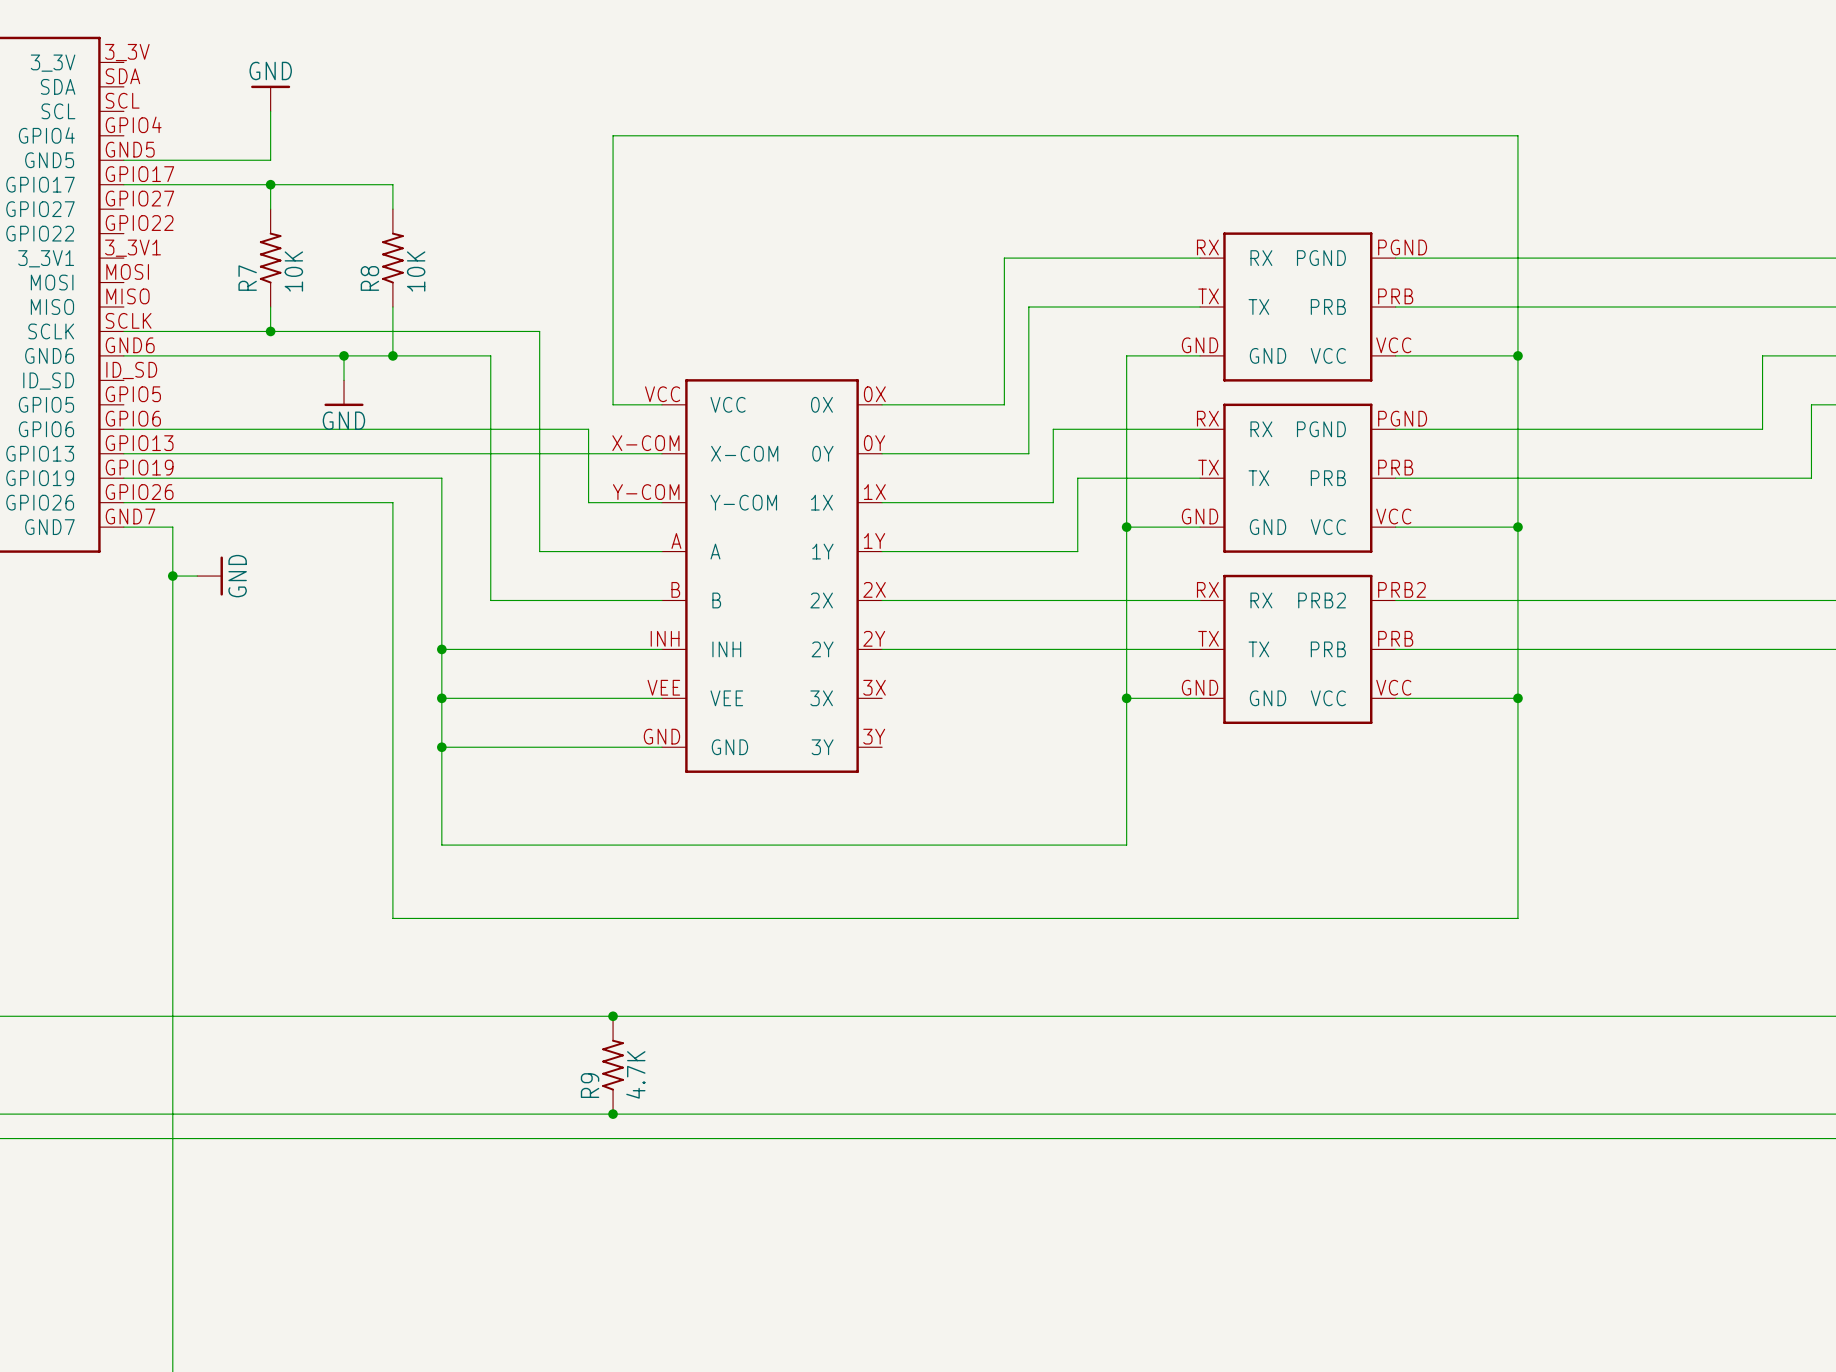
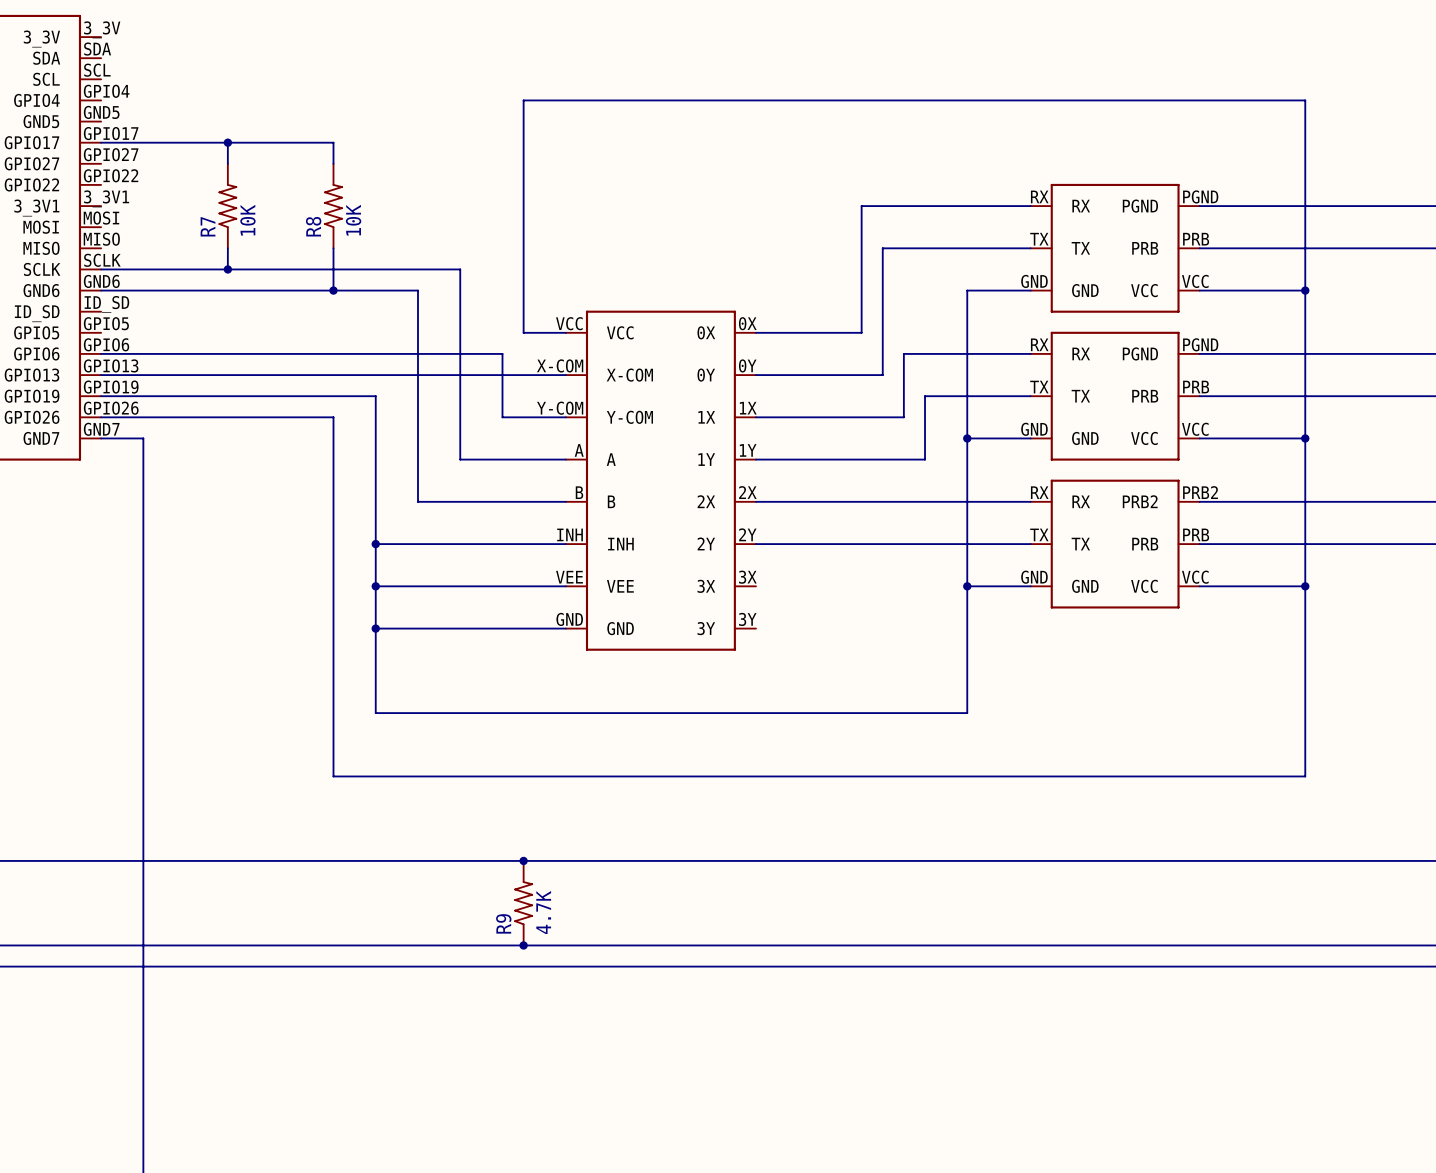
power symbol: GND (270, 98) -> none
wire: (270, 111) (270, 160) (123, 160) -> none
wire: (344, 355) (344, 380) -> none
junction: (344, 355) -> none
power symbol: GND (344, 393) -> none
wire: (172, 576) (197, 576) -> none
junction: (172, 576) -> none
power symbol: GND (210, 576) -> none

